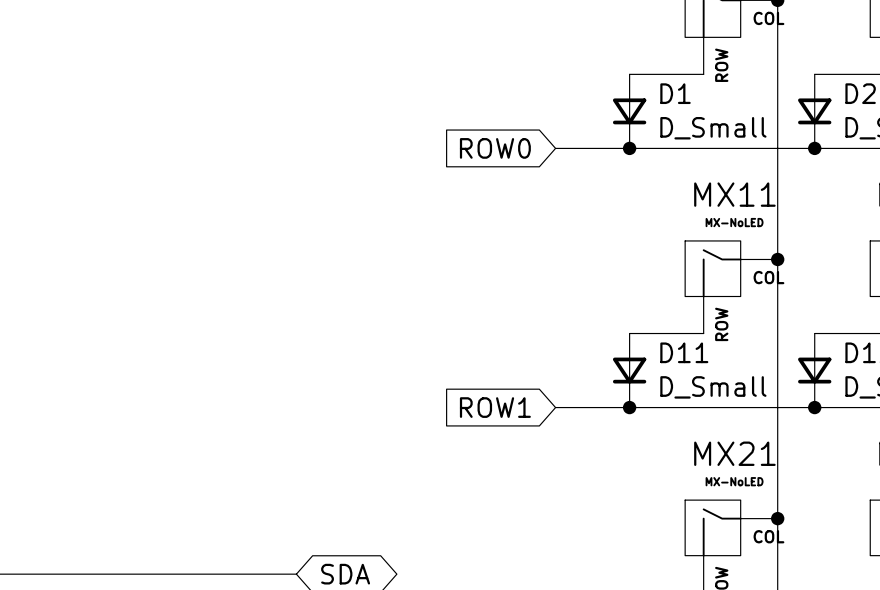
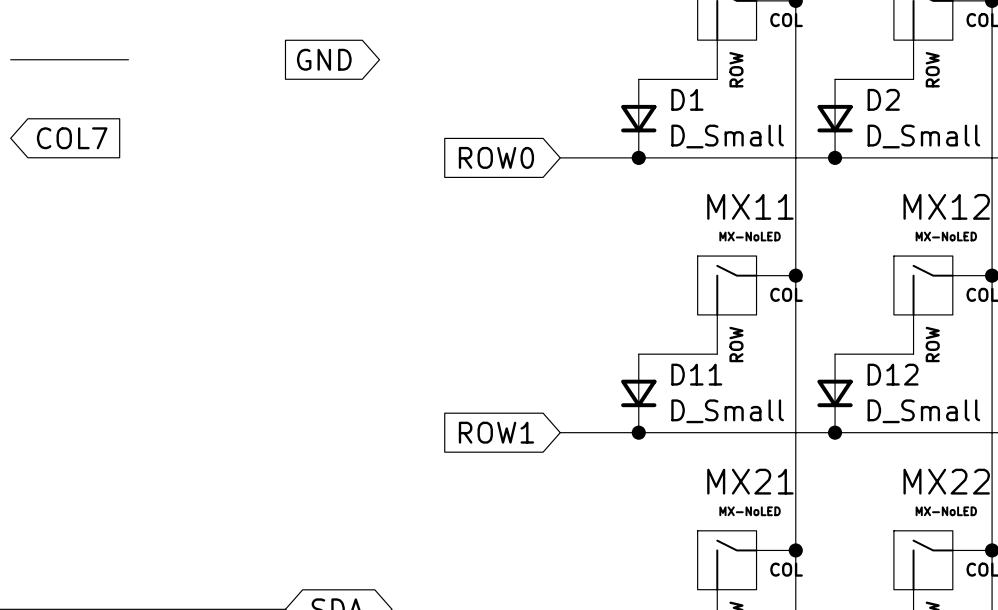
wire: none -> (10, 59) (128, 59)
global label: none -> GND (324, 59)
global label: none -> COL7 (72, 138)

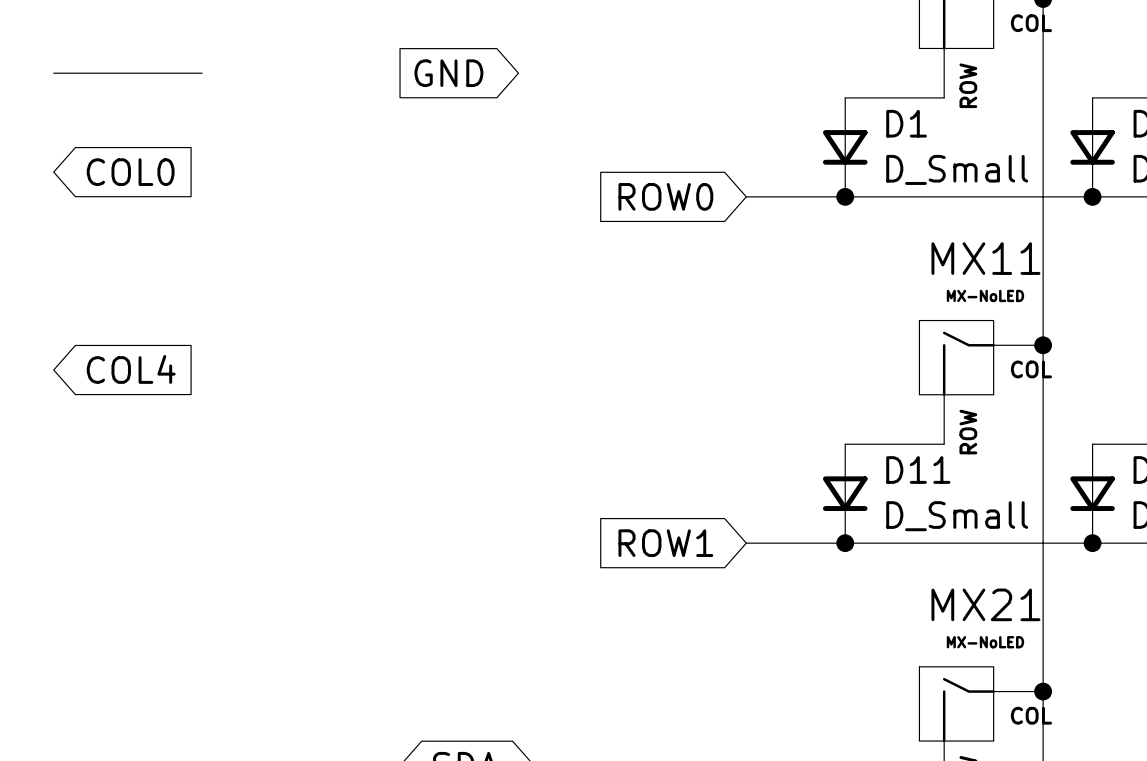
global label: COL7 (72, 138) -> COL0 (130, 172)
global label: none -> COL4 (131, 369)

